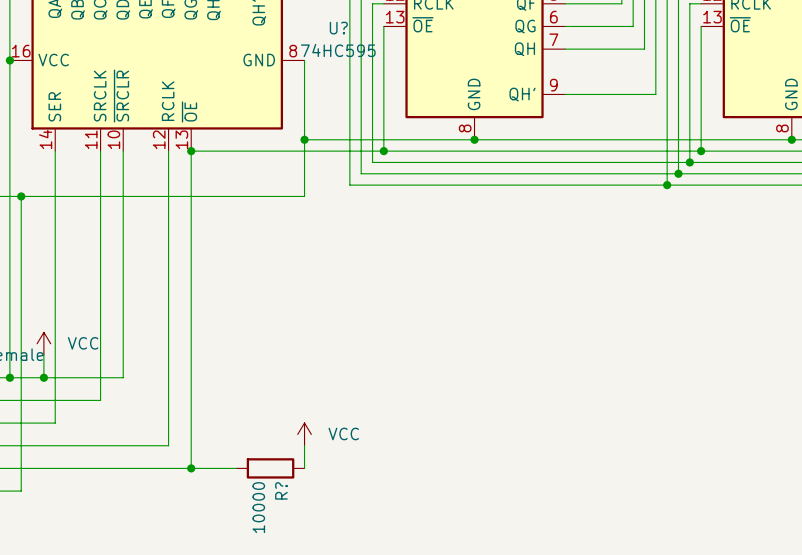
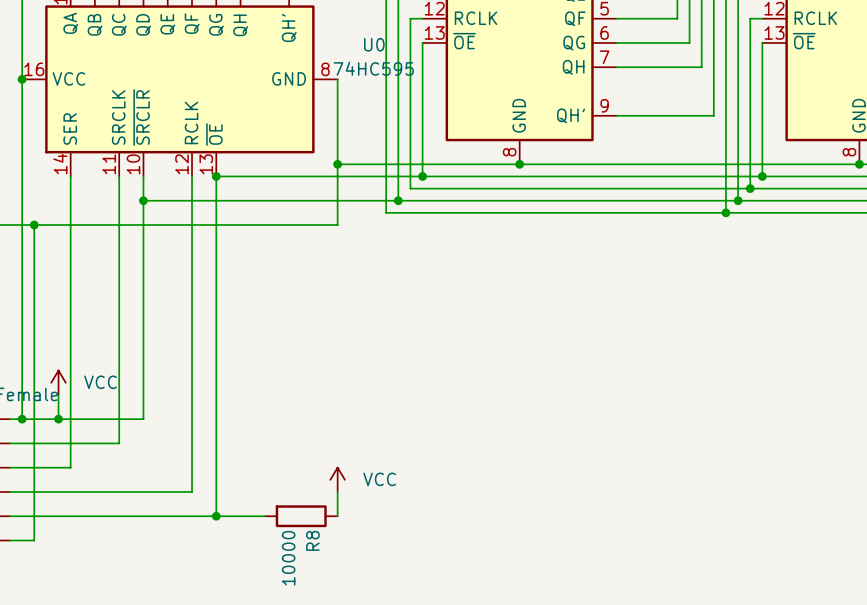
U? name: U? (338, 28) -> U0 (374, 44)
wire: none -> (143, 200) (398, 200)
junction: none -> (143, 200)
junction: none -> (398, 200)
R? name: R? (281, 490) -> R8 (312, 540)

